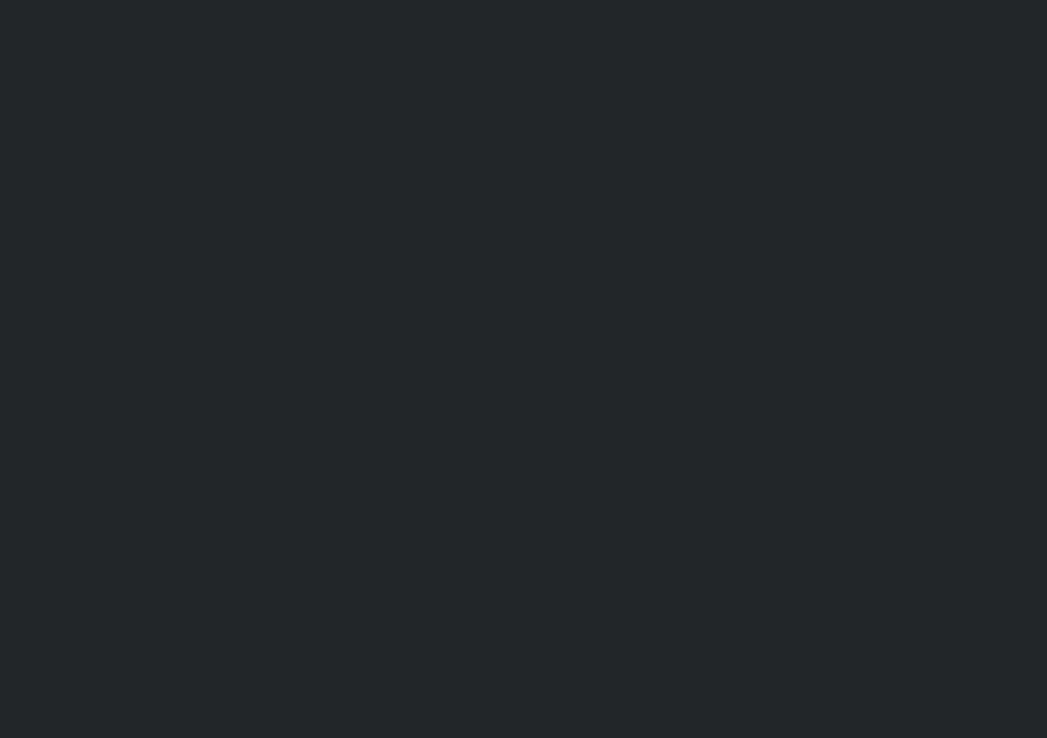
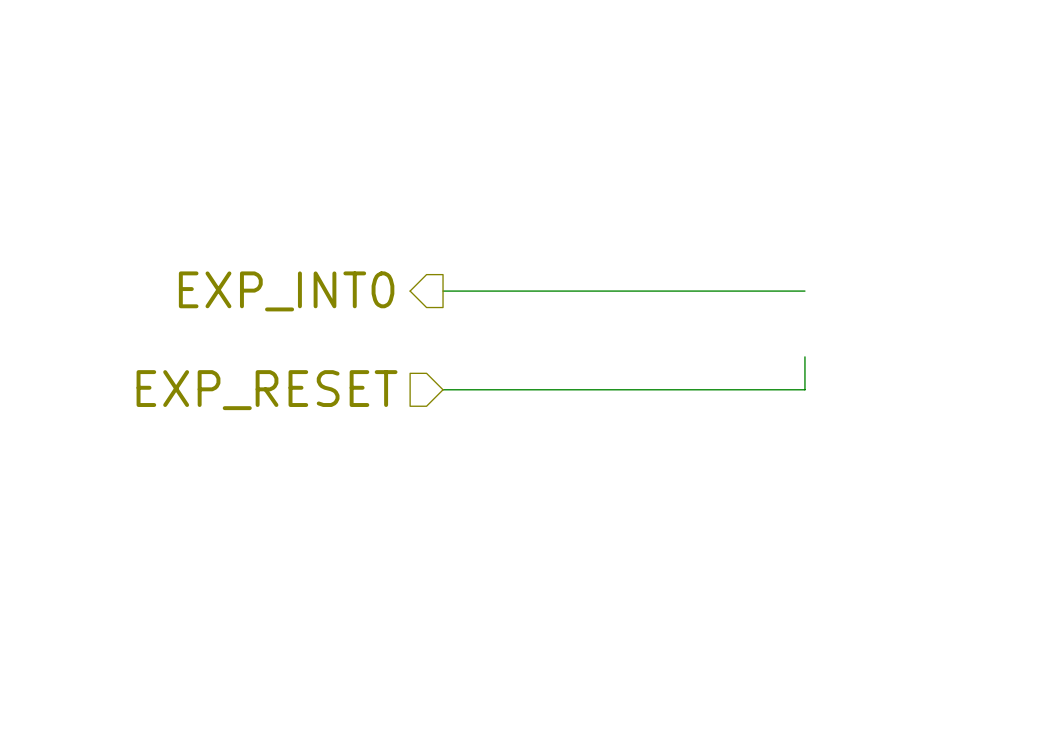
hierarchical label: none -> EXP_INT0 (286, 291)
wire: none -> (443, 291) (804, 291)
wire: none -> (804, 356) (804, 389) (443, 389)
hierarchical label: none -> EXP_RESET (267, 390)

